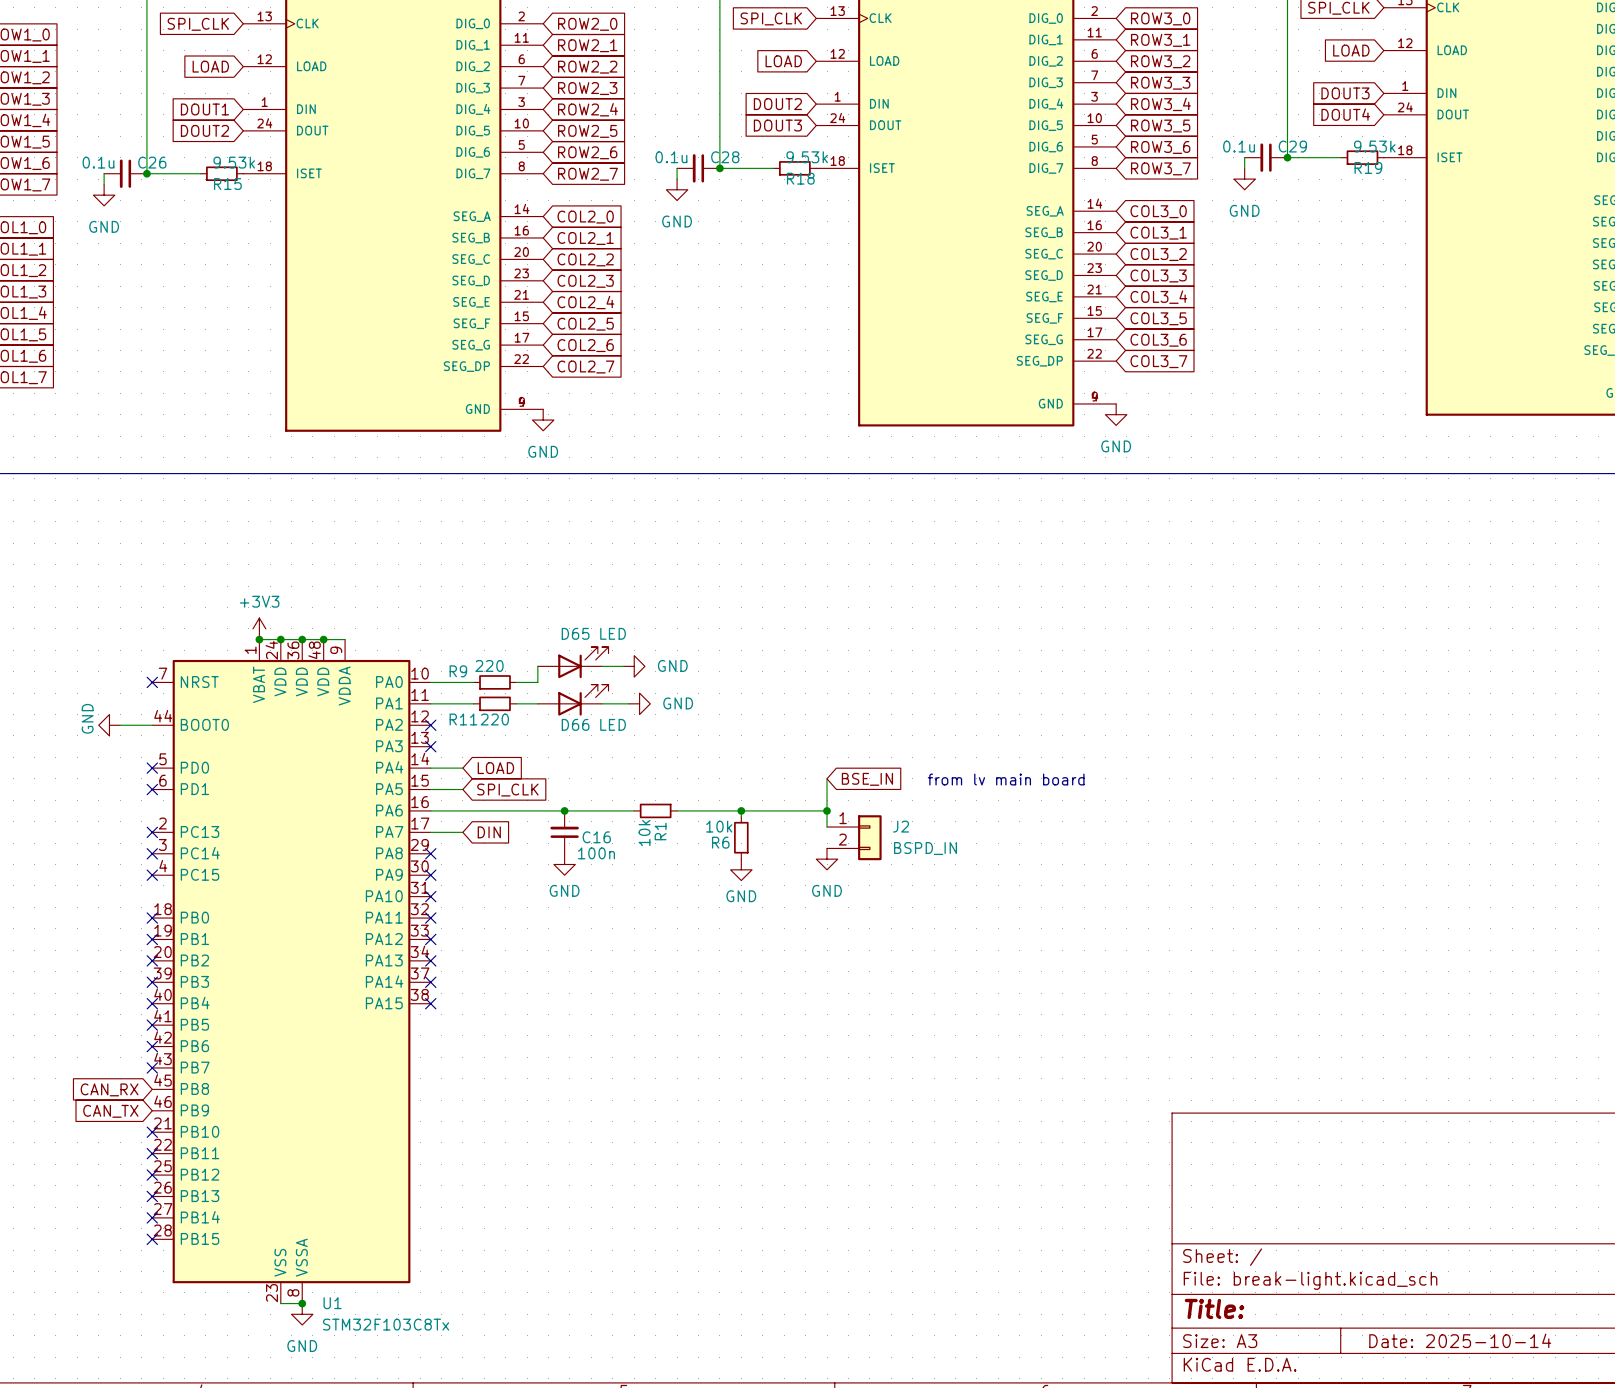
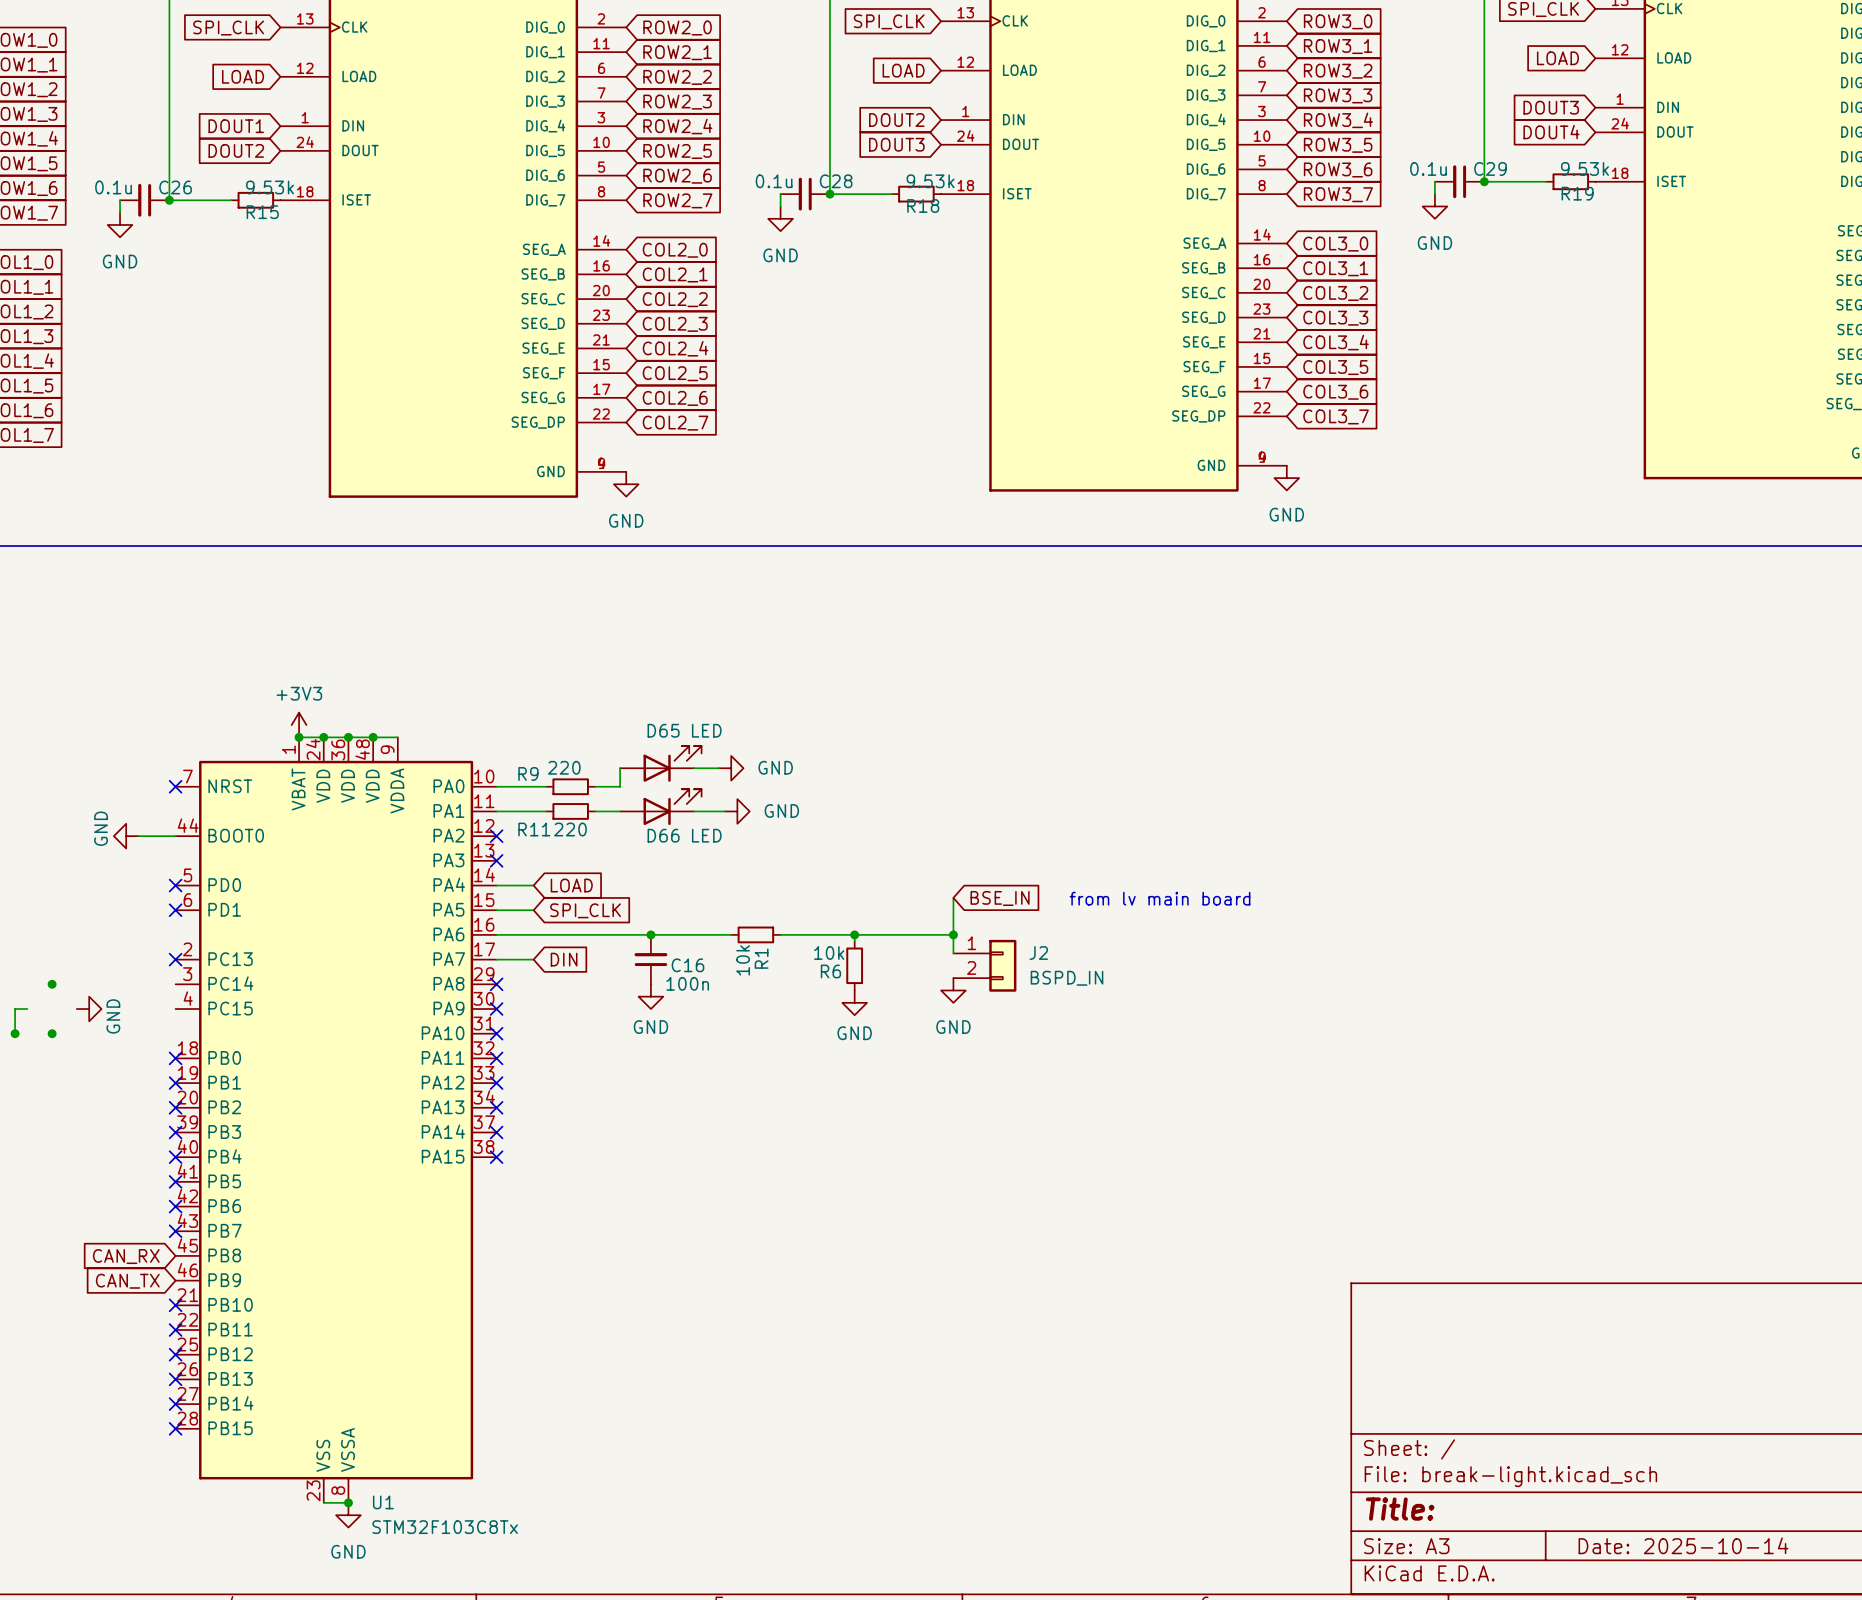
junction: none -> (52, 984)
no-connect mark: (152, 853) -> none
wire: none -> (27, 1009) (15, 1009) (15, 1033)
power symbol: none -> GND (89, 1009)
no-connect mark: (152, 875) -> none
junction: none -> (15, 1033)
junction: none -> (52, 1033)

